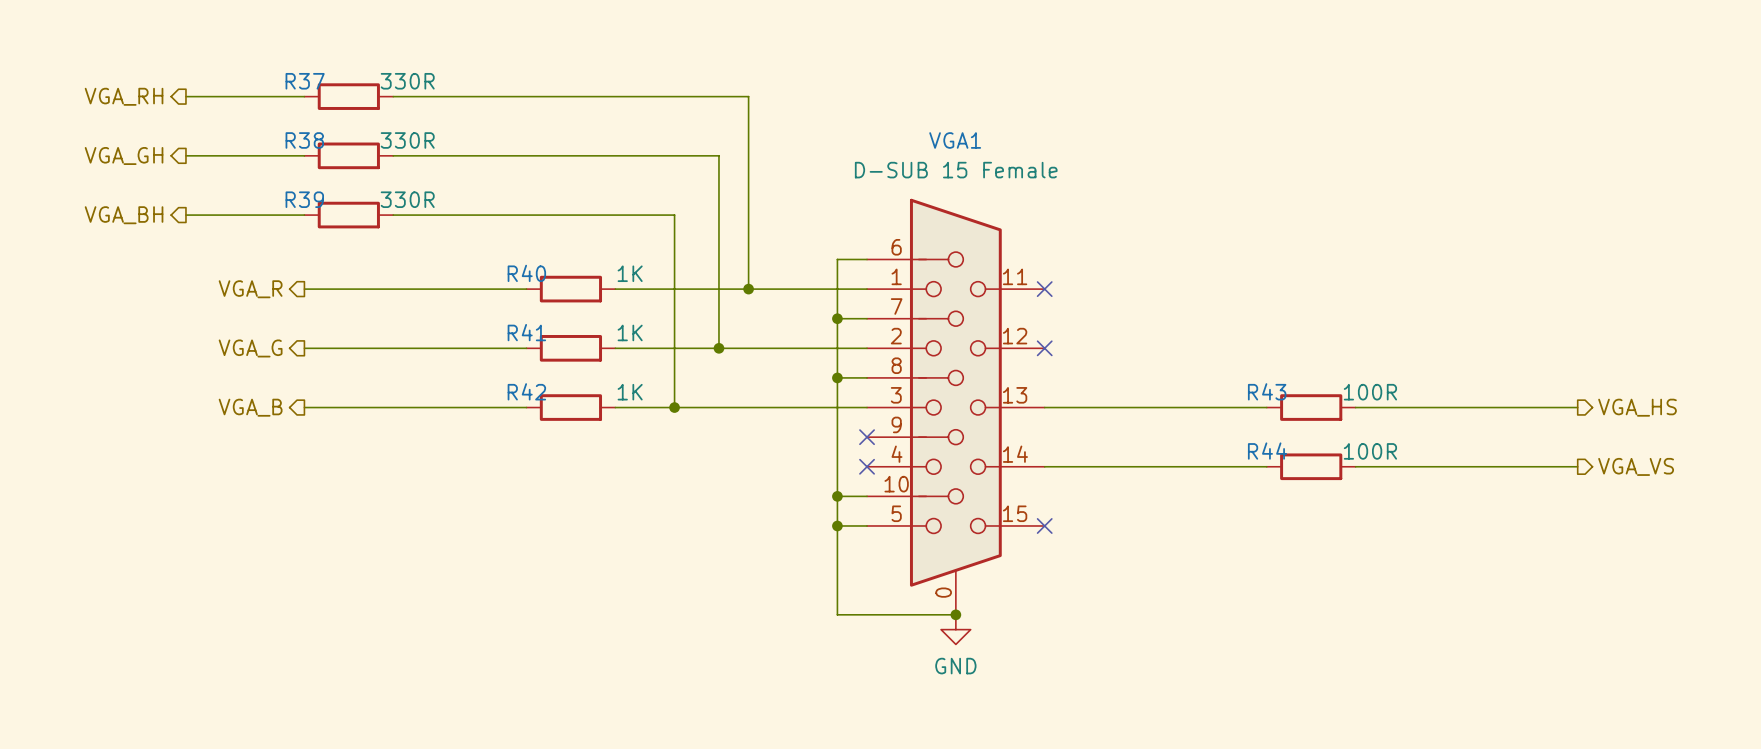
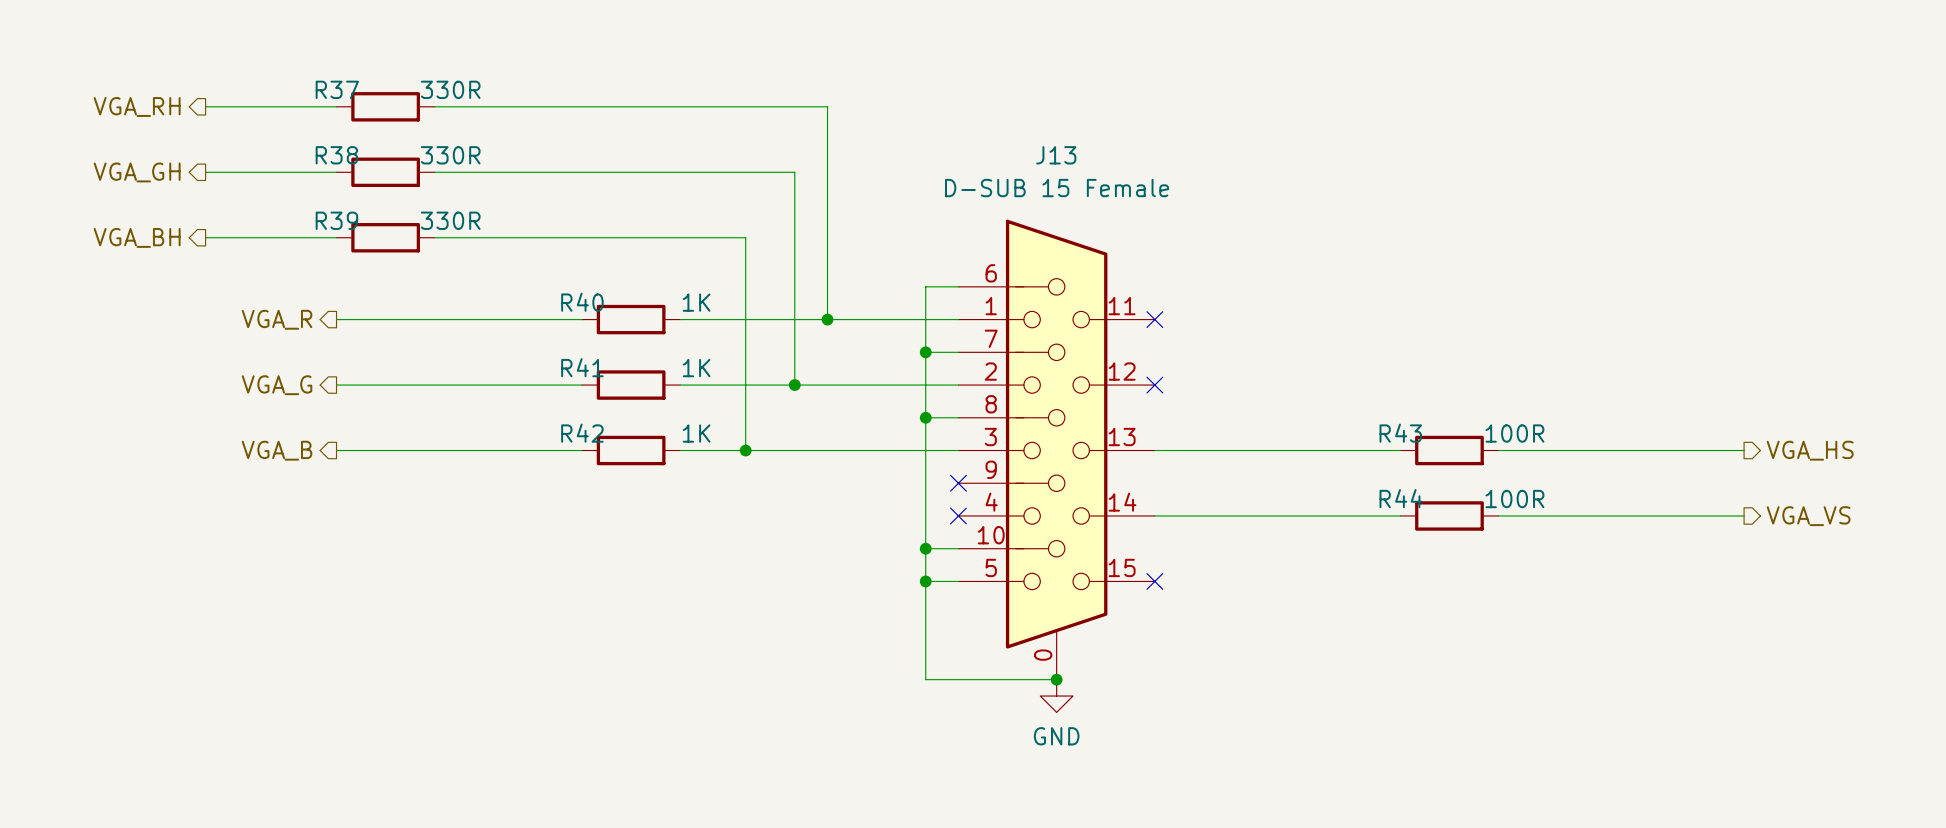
VGA1 name: VGA1 (955, 140) -> J13 (1056, 155)

